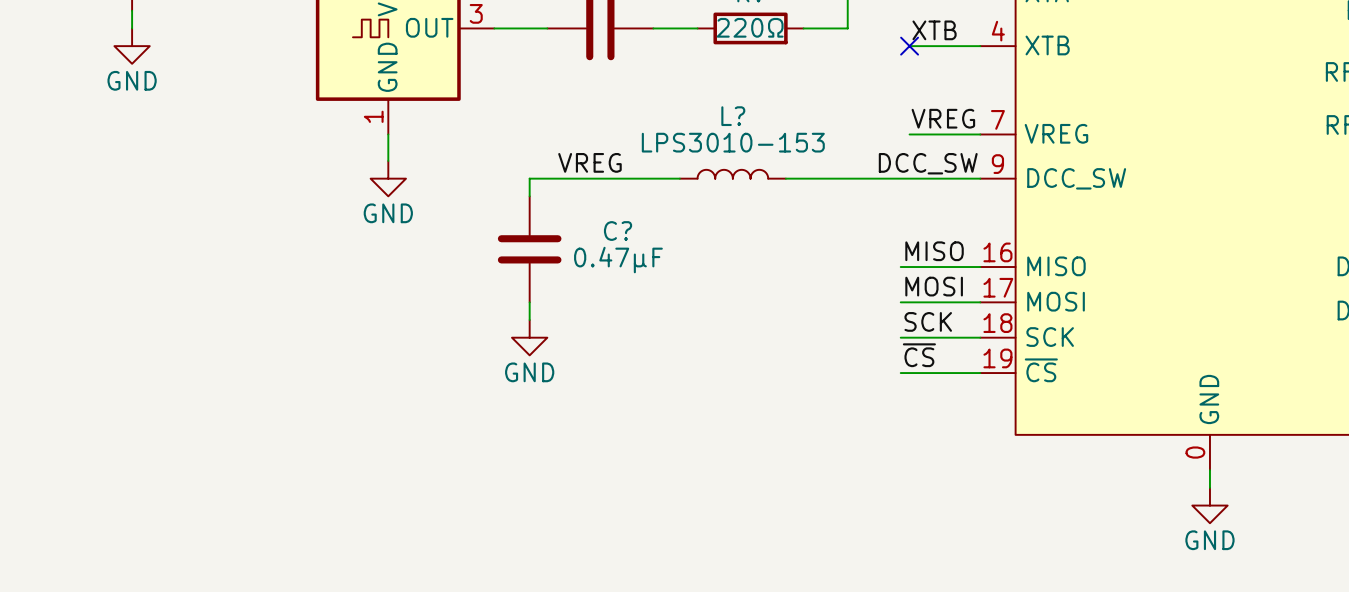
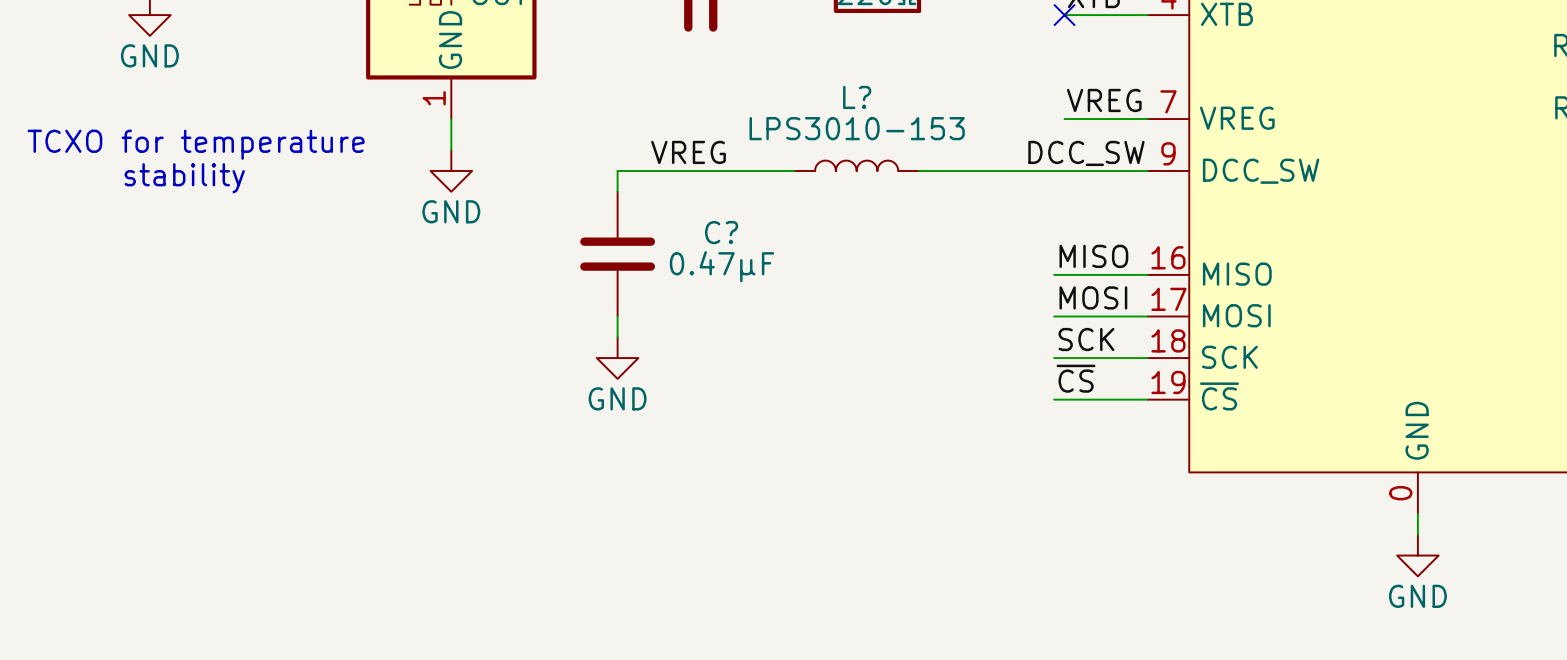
text: none -> TCXO for temperature (196, 144)
text: none -> stability (184, 178)

